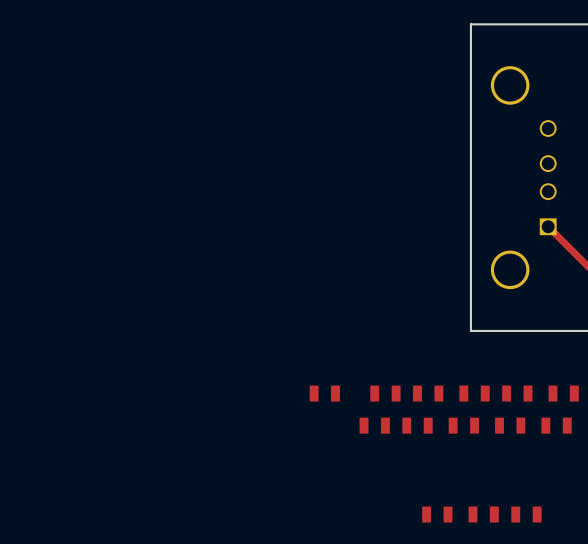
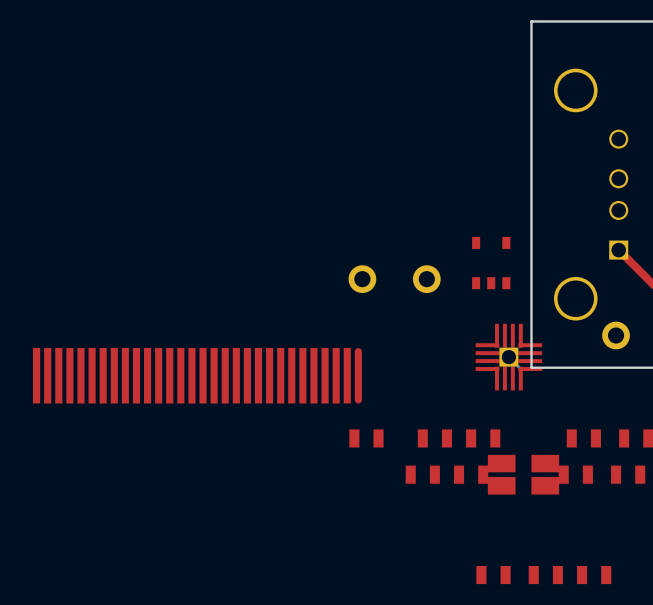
part: none -> (491, 263)
part: none -> (362, 279)
part: none -> (426, 279)
part: none -> (616, 335)
part: none -> (508, 357)
part: none -> (197, 375)
part: (474, 393) -> none
part footprint: [448, 417, 480, 434] -> [487, 454, 560, 495]

